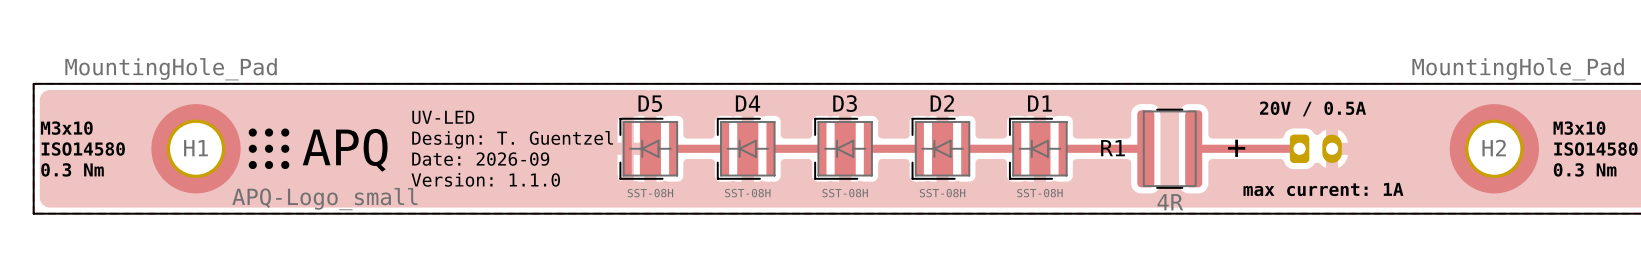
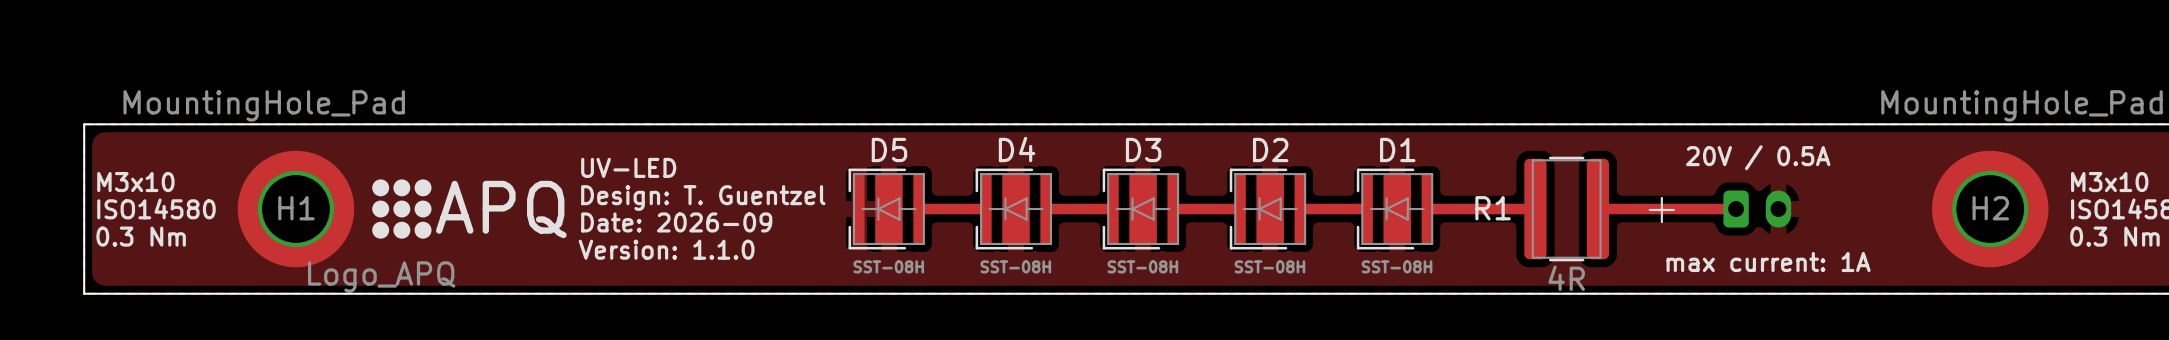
drawing shape: [232, 128, 418, 211] -> [307, 179, 567, 293]

